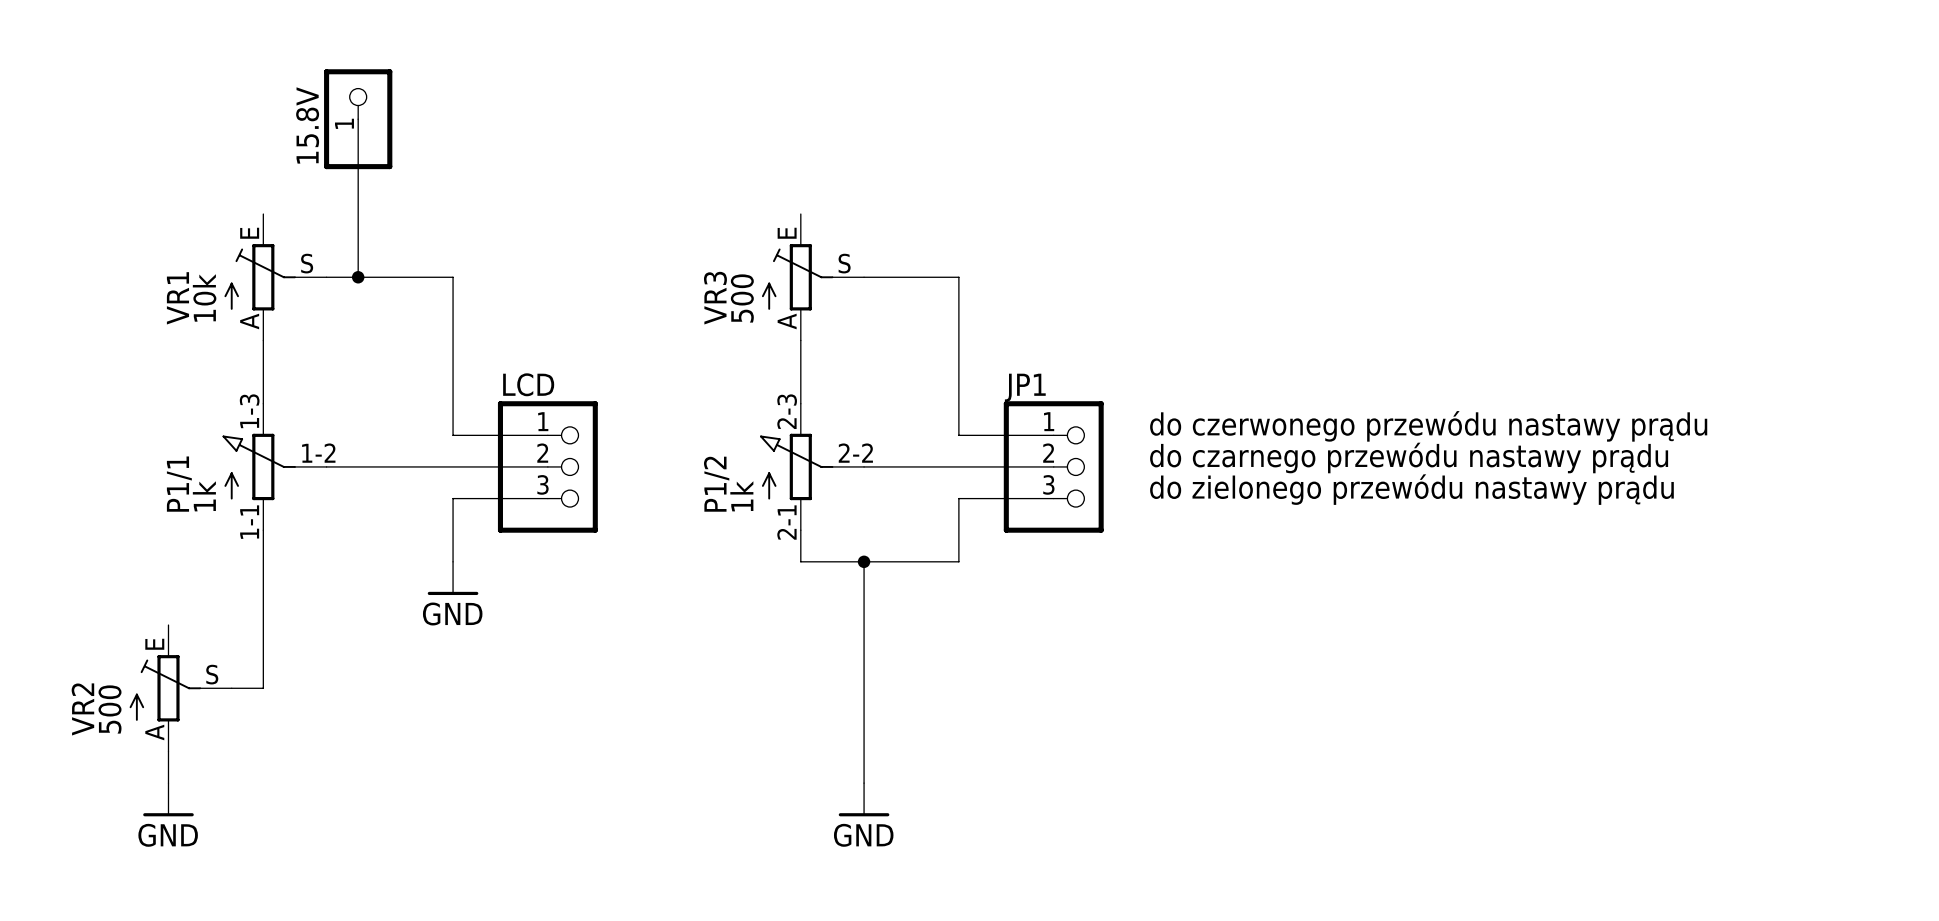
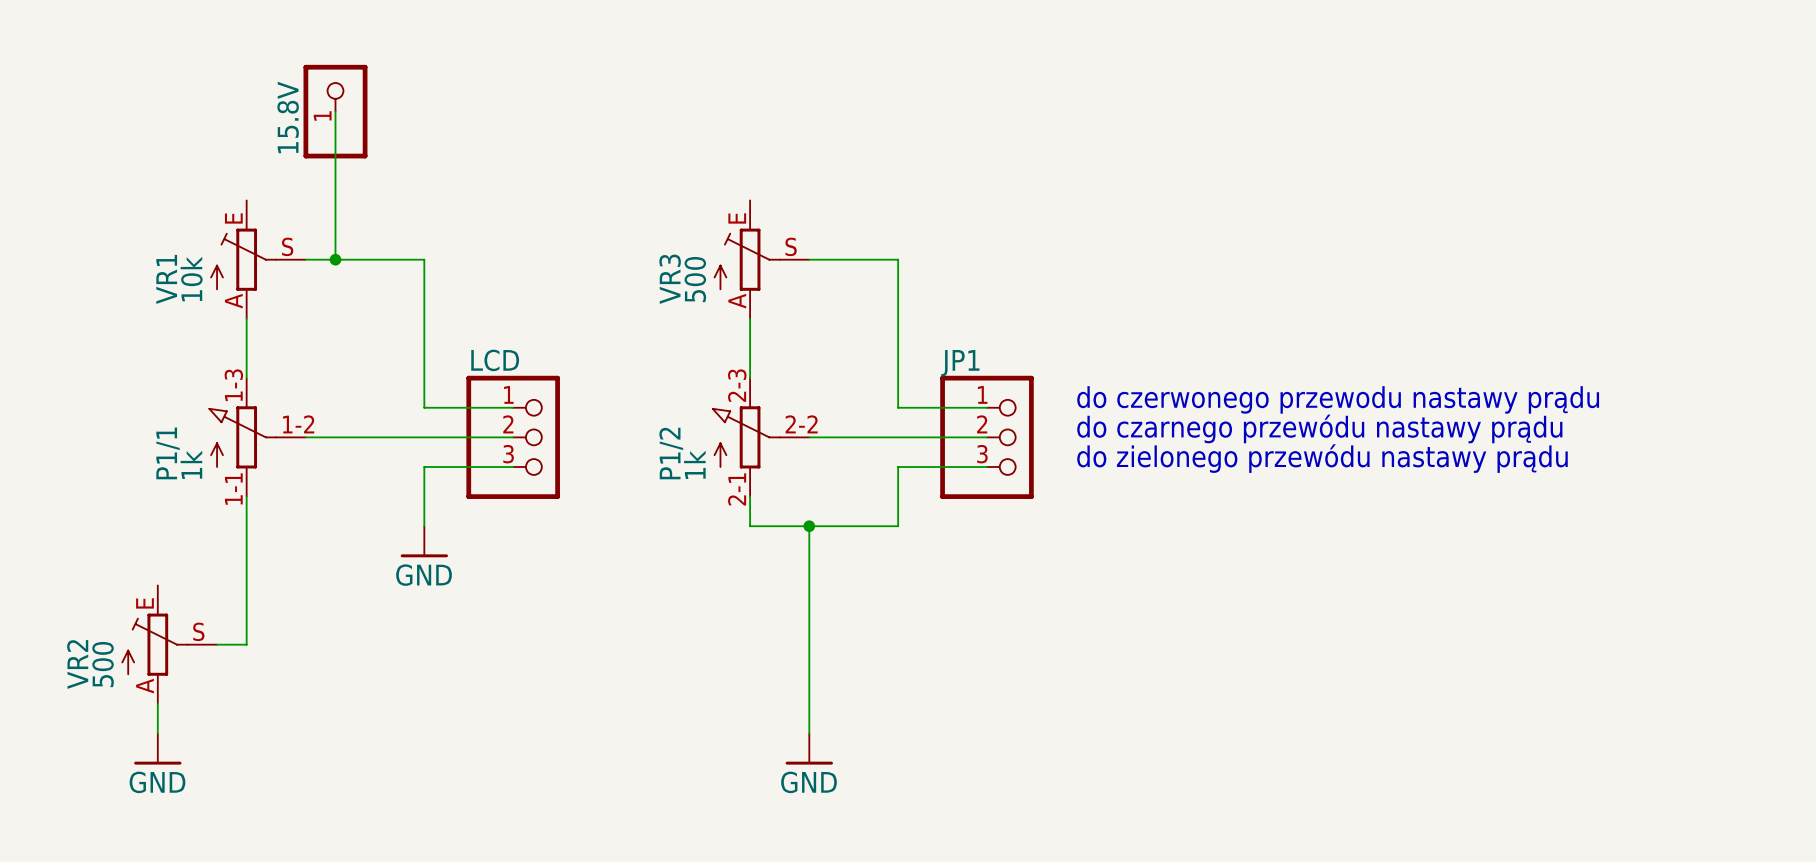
text: do czerwonego przewódu nastawy prądu (1428, 426) -> do czerwonego przewodu nastawy prądu (1338, 399)

